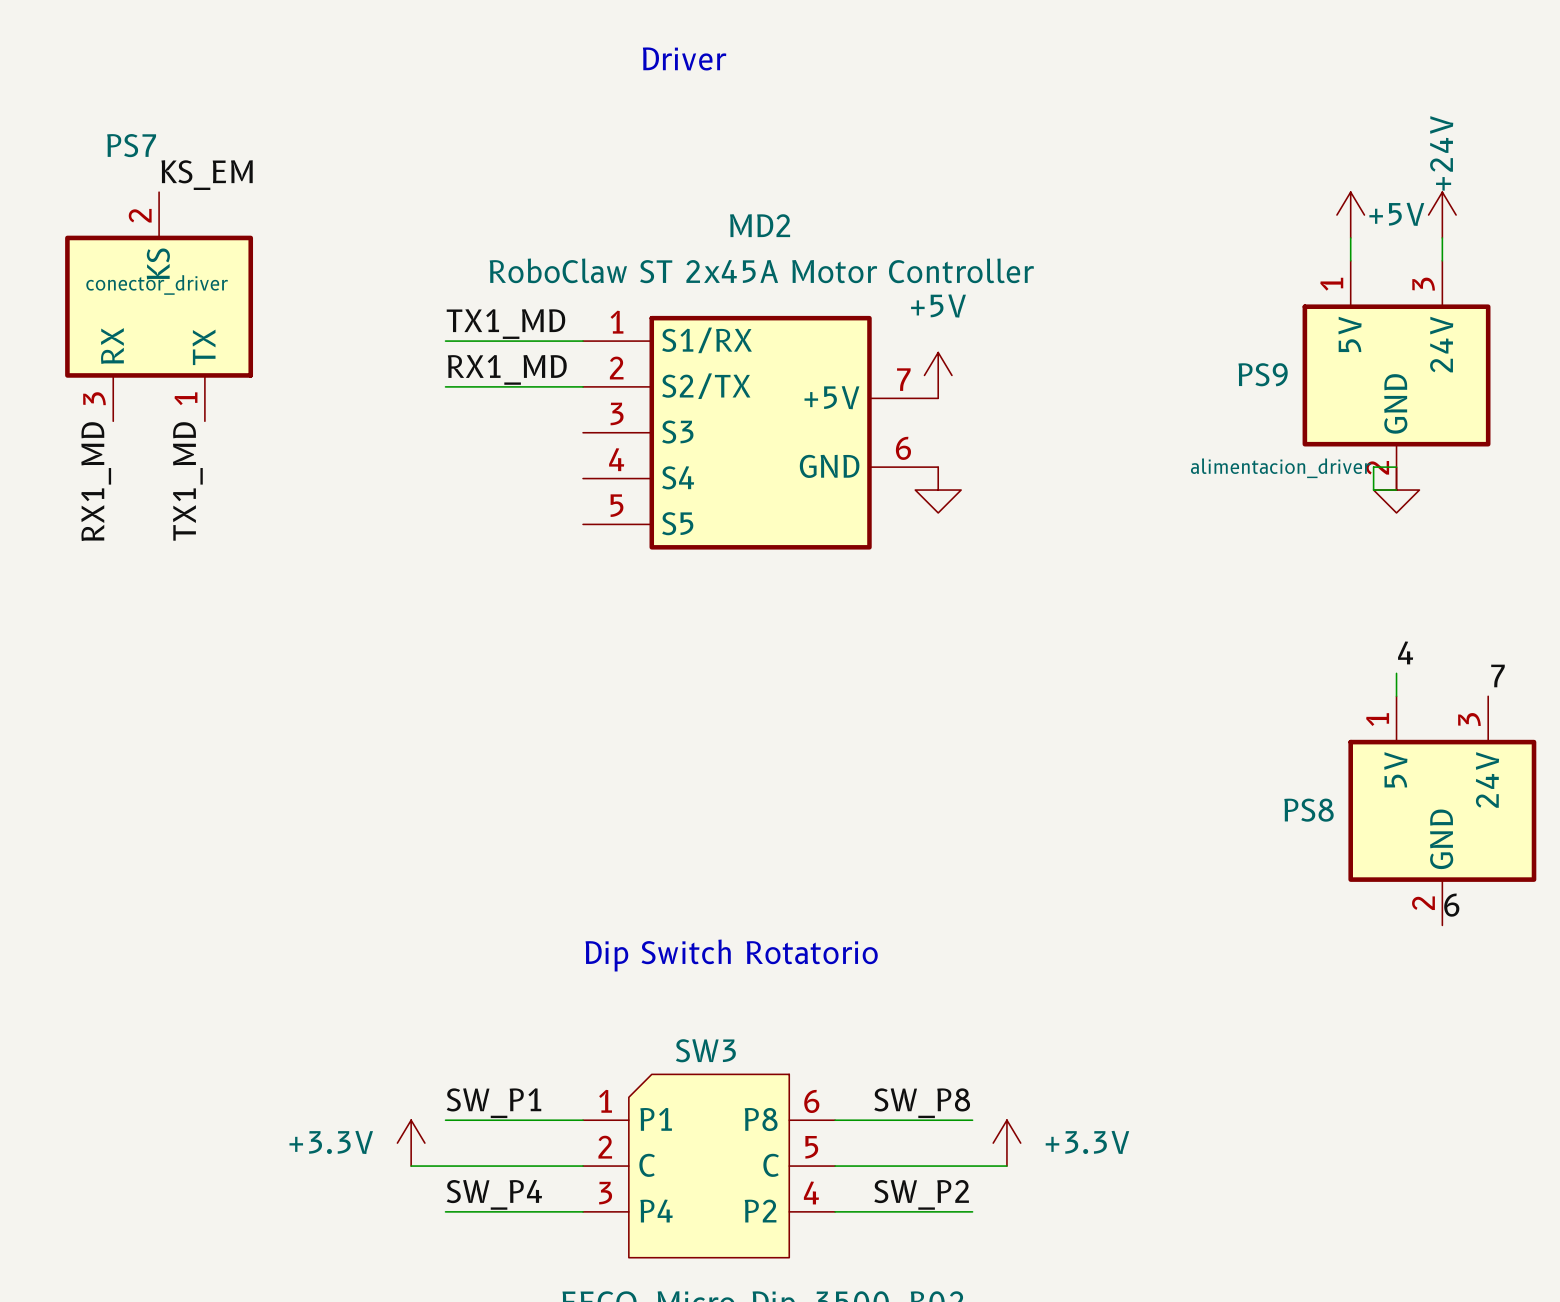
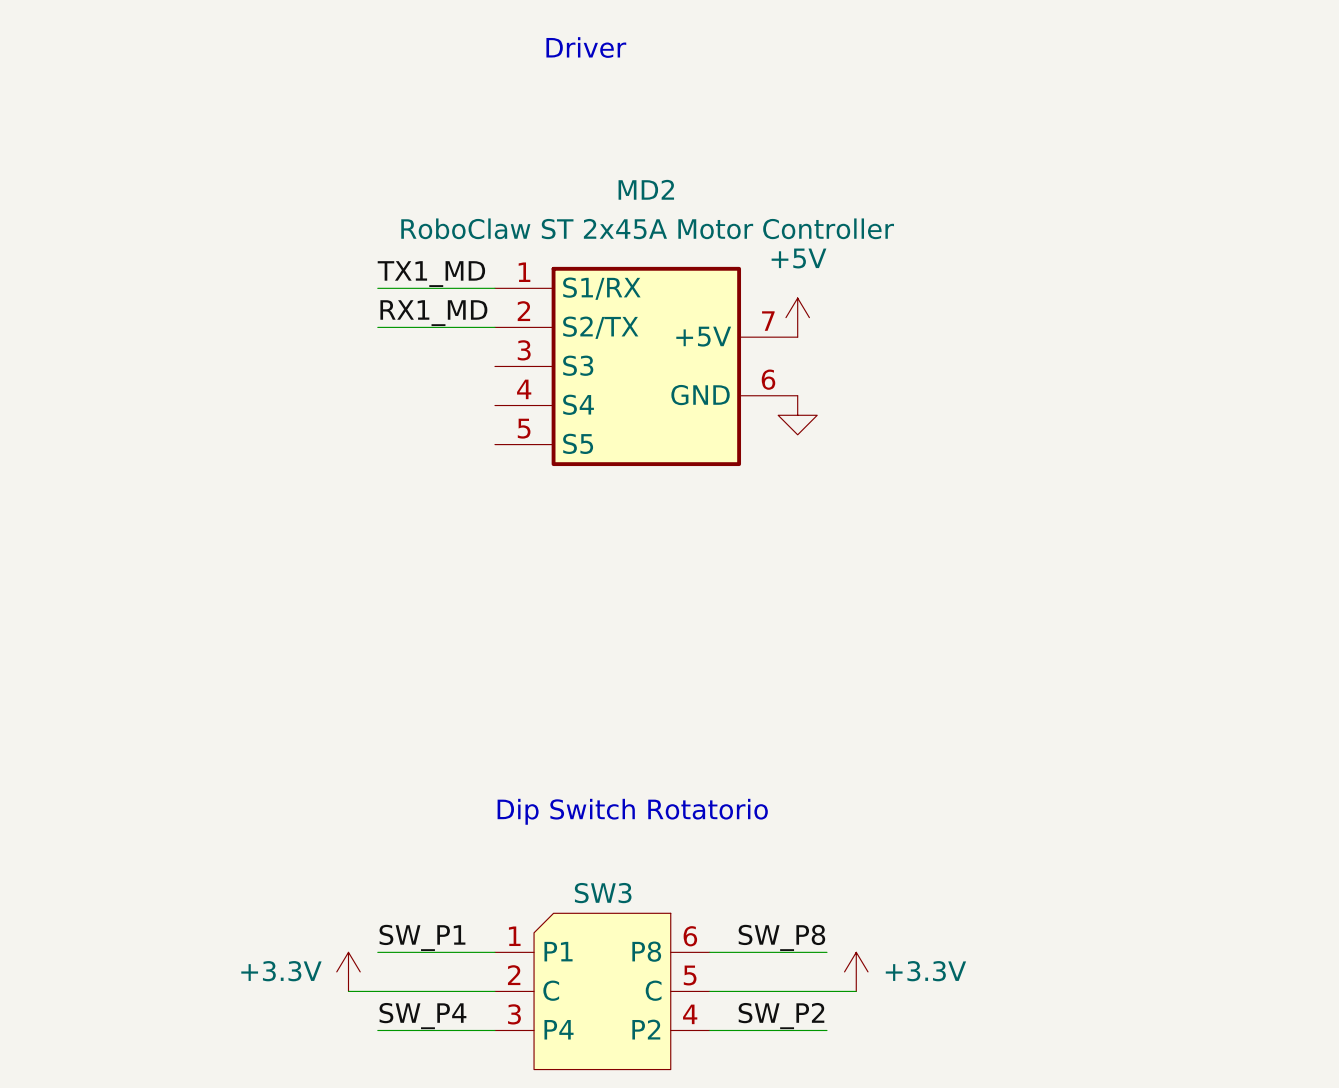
label: KS_EM (207, 175) -> none
power symbol: +5V (1350, 215) -> none
power symbol: +24V (1442, 215) -> none
wire: (1350, 237) (1350, 260) -> none
wire: (1442, 237) (1442, 260) -> none
PS7: conector_driver (159, 306) -> none
PS9: alimentacion_driver (1396, 375) -> none
wire: (1396, 467) (1373, 467) (1373, 490) (1396, 490) -> none
label: RX1_MD (96, 481) -> none
label: TX1_MD (187, 481) -> none
power symbol: (1396, 490) -> none
label: 4 (1405, 652) -> none
wire: (1396, 673) (1396, 696) -> none
label: 7 (1497, 675) -> none
PS8: (1442, 810) -> none
label: 6 (1451, 905) -> none

